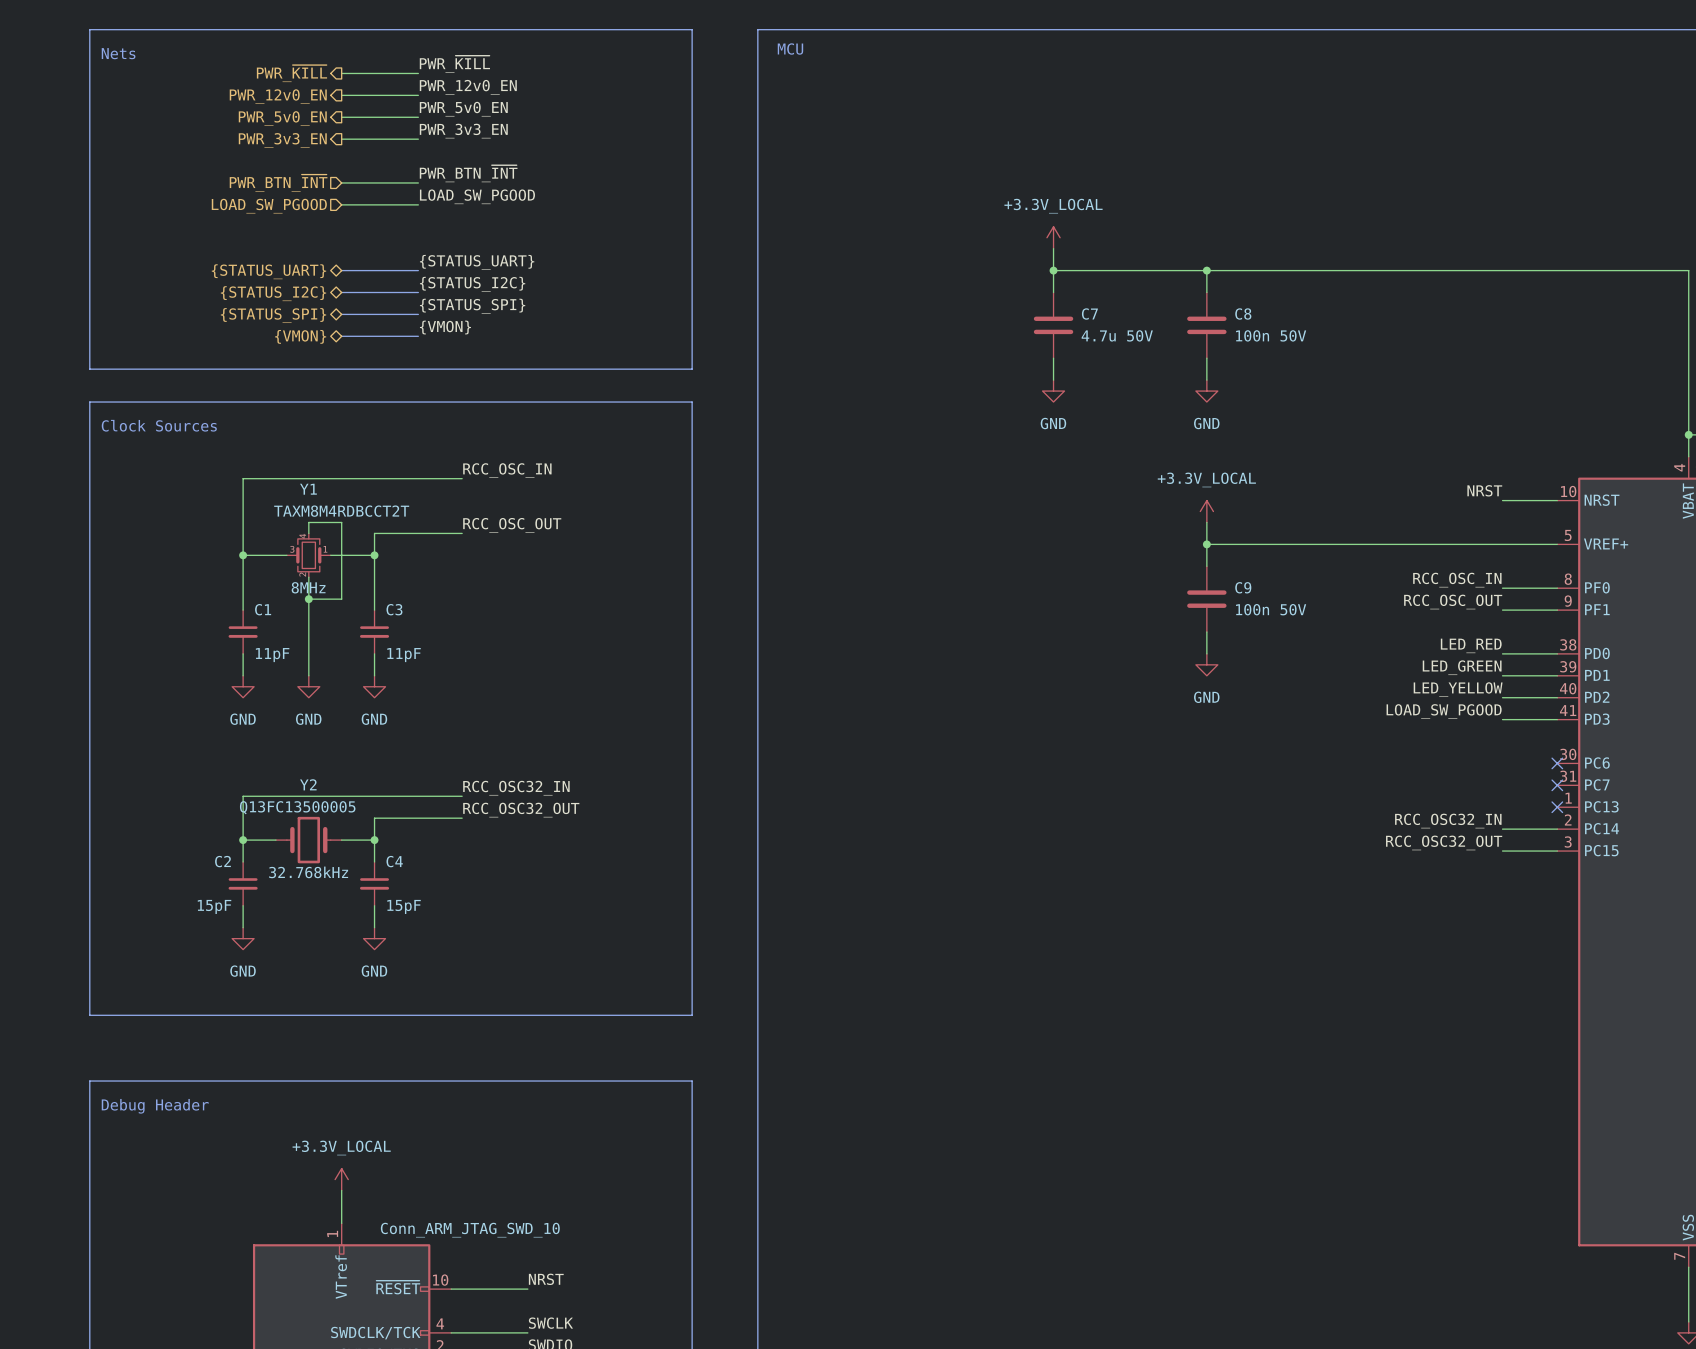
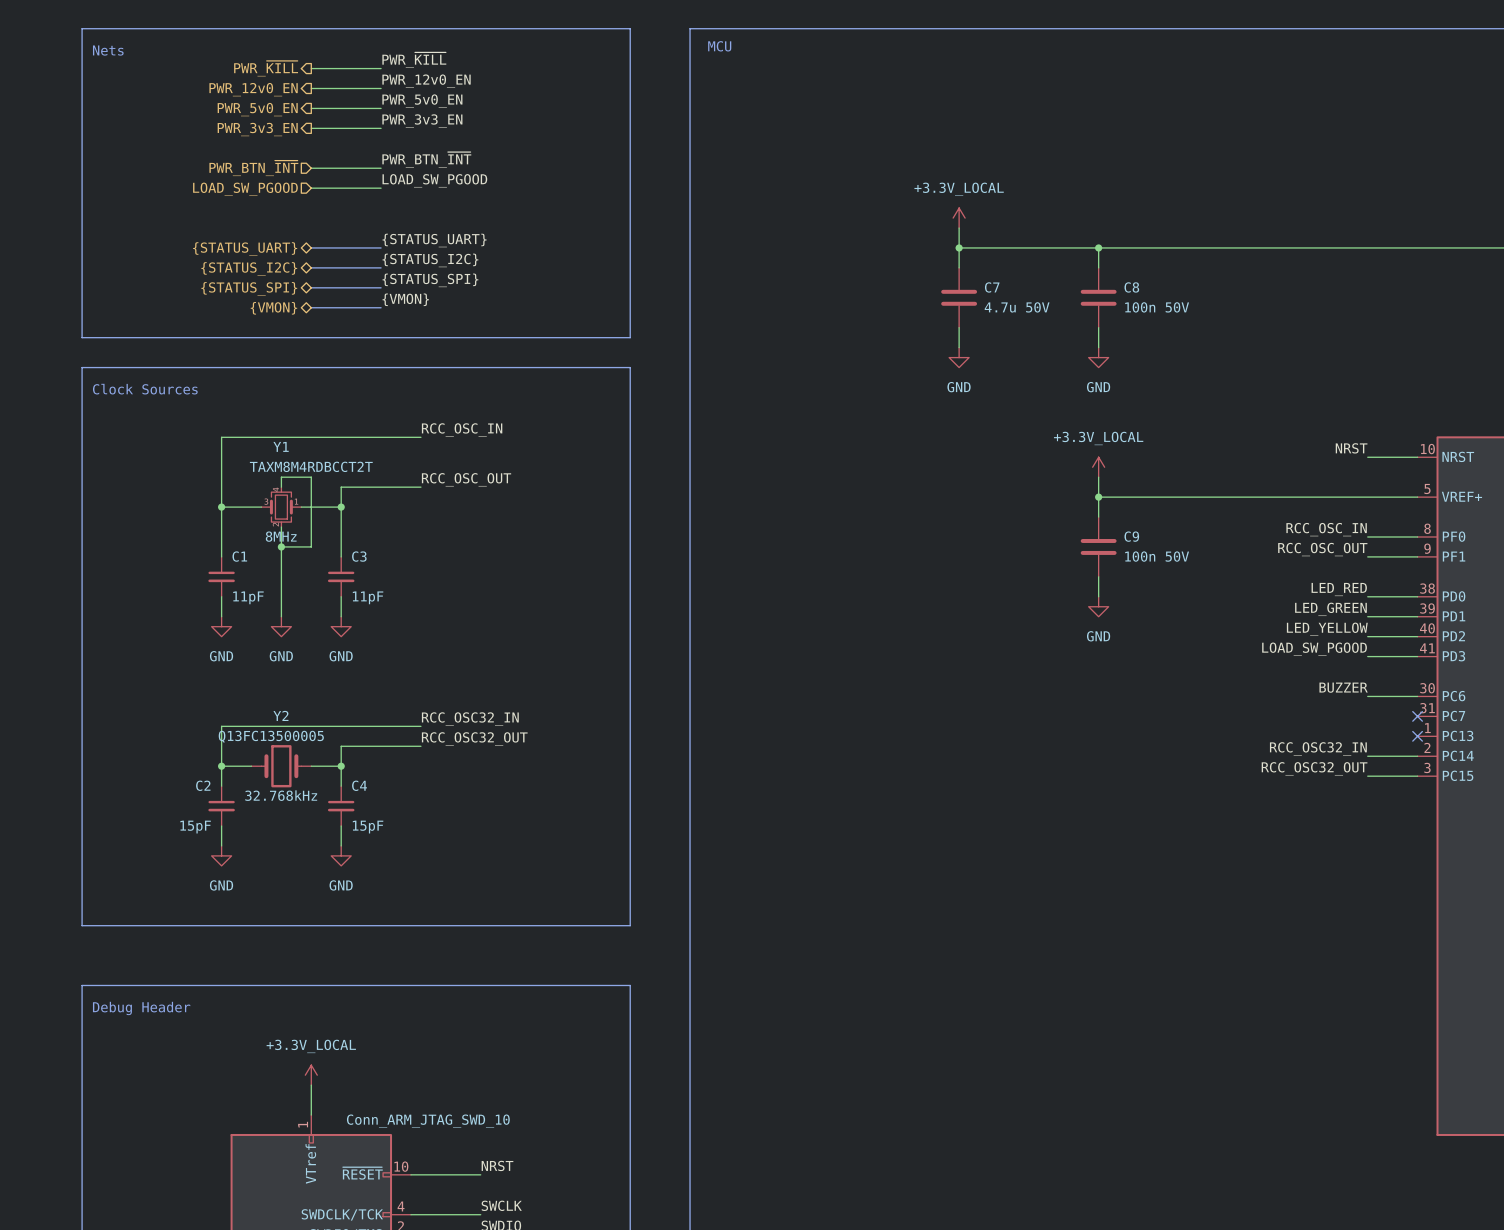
label: none -> BUZZER (1343, 687)
wire: none -> (1367, 696) (1417, 696)
no-connect mark: (1557, 763) -> none

